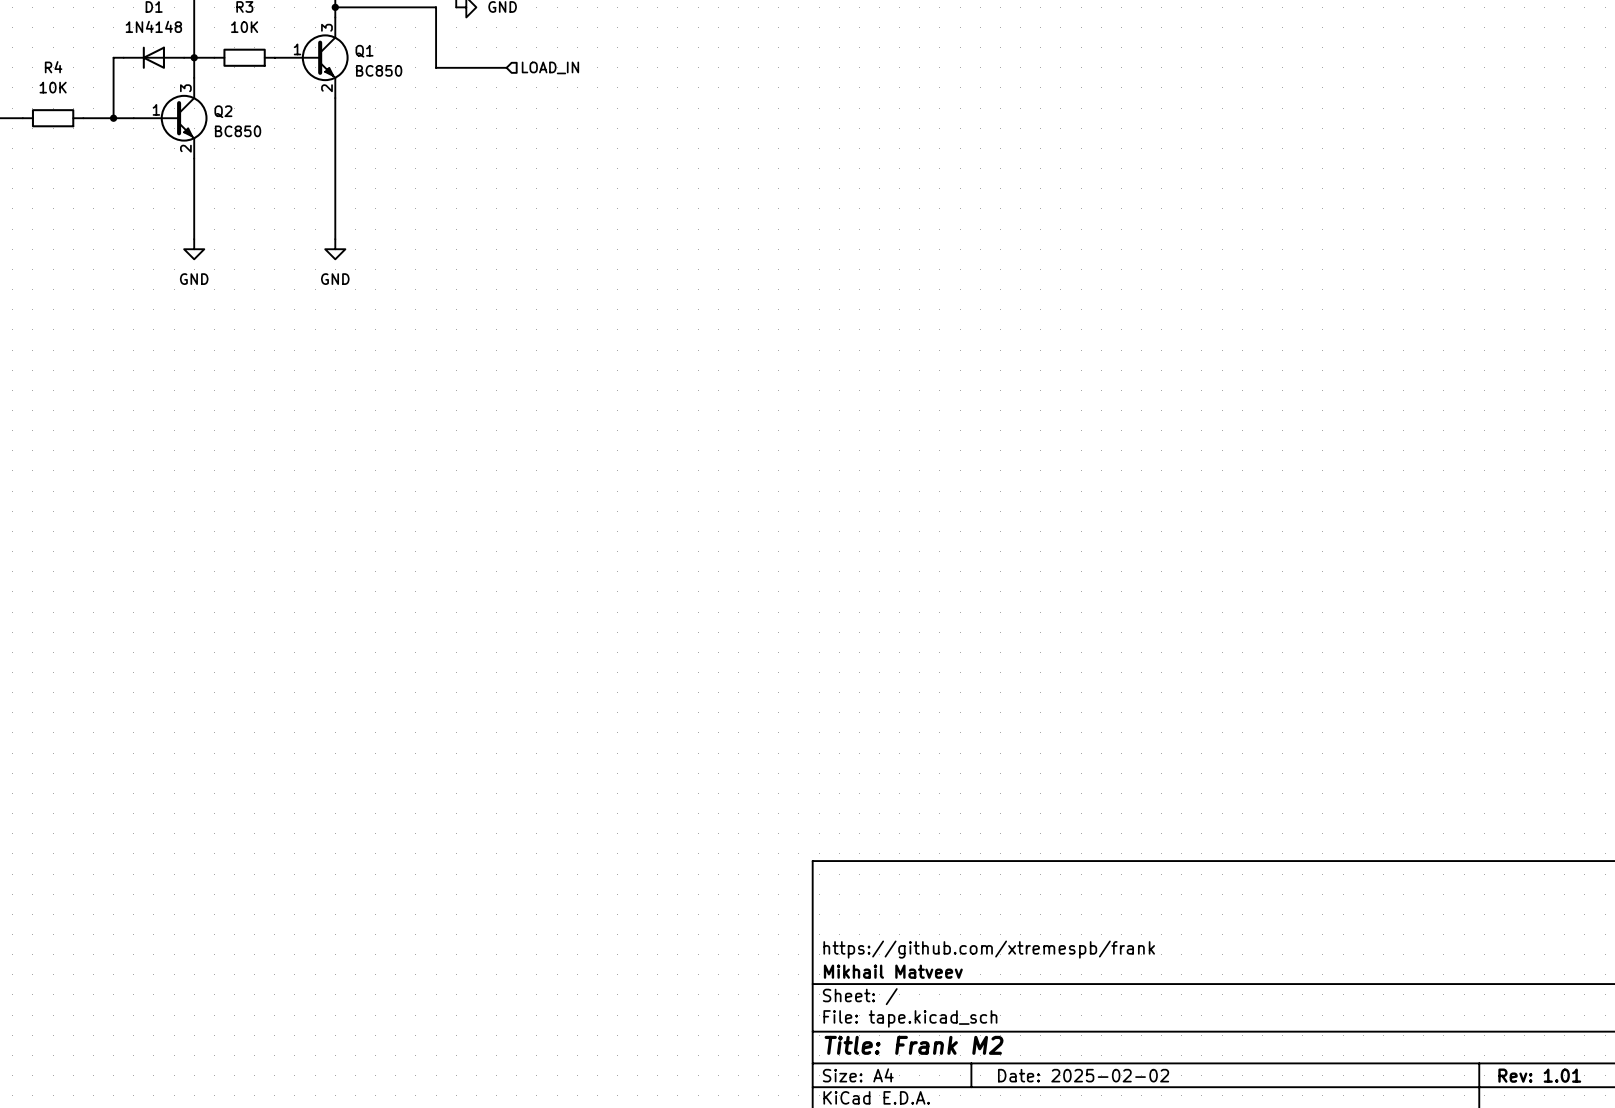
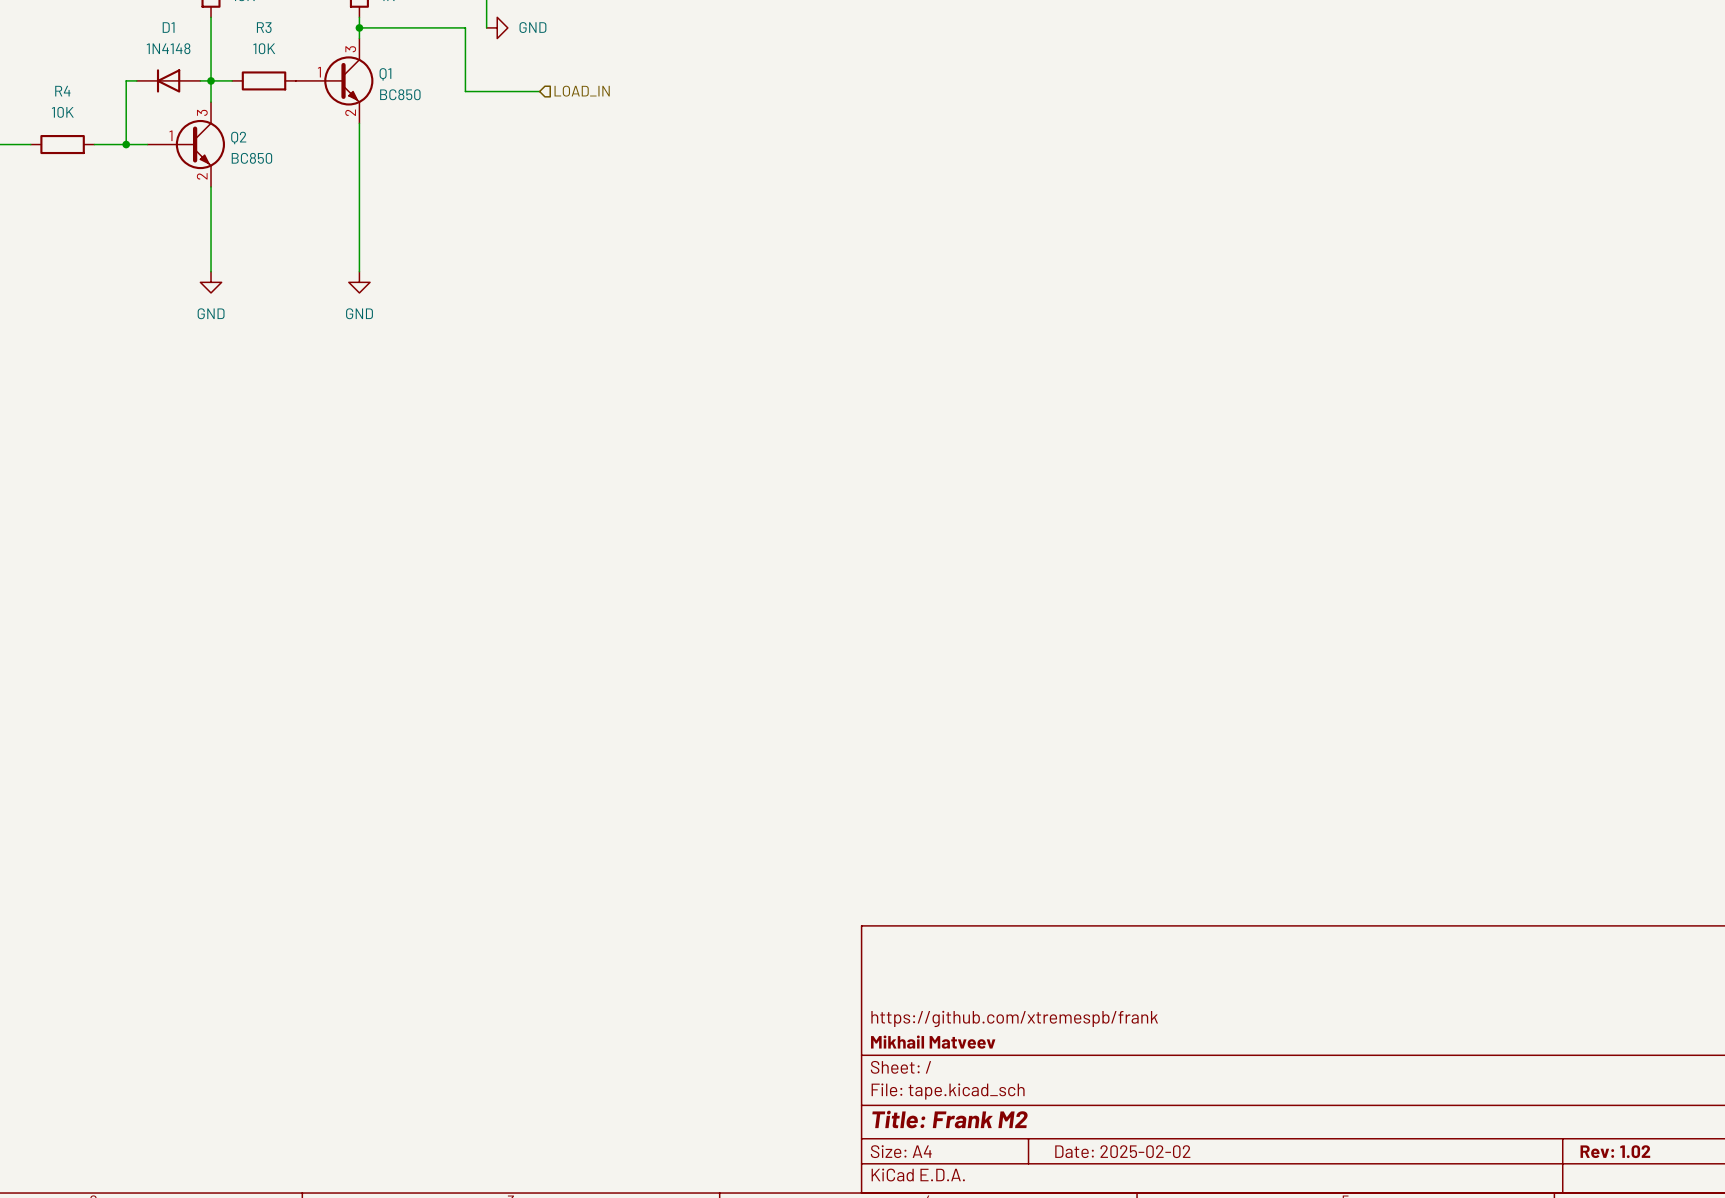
title block: Rev: 1.01 (1539, 1075) -> Rev: 1.02 (1615, 1151)

